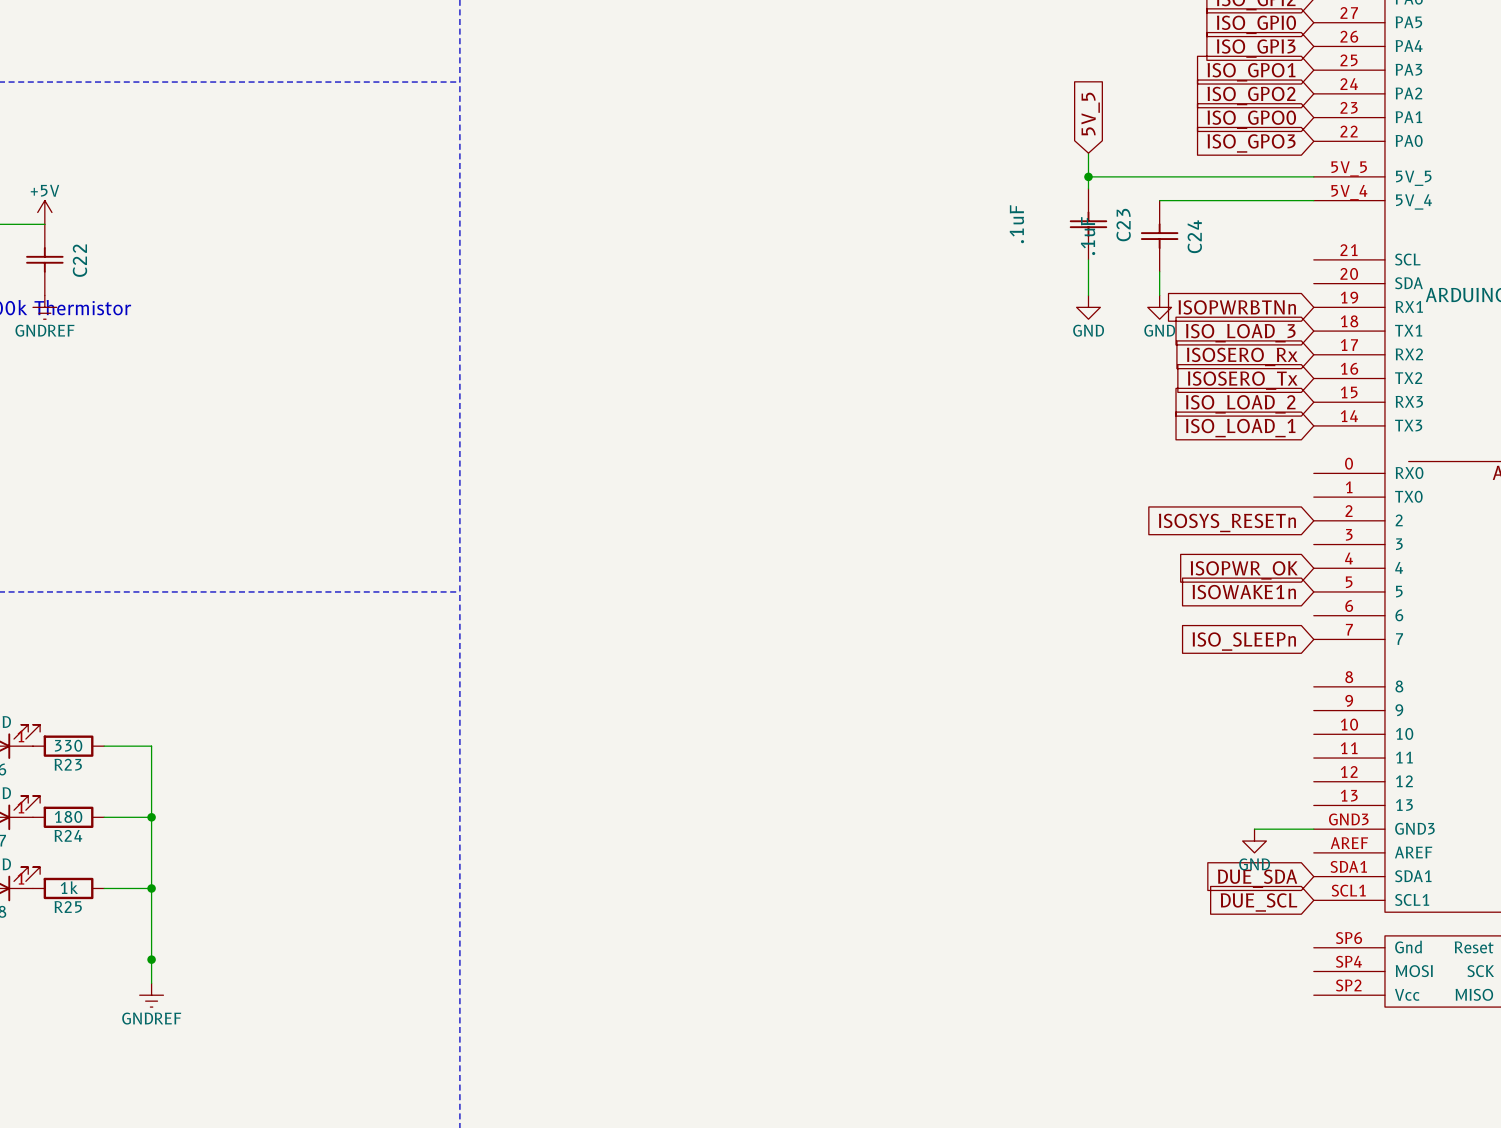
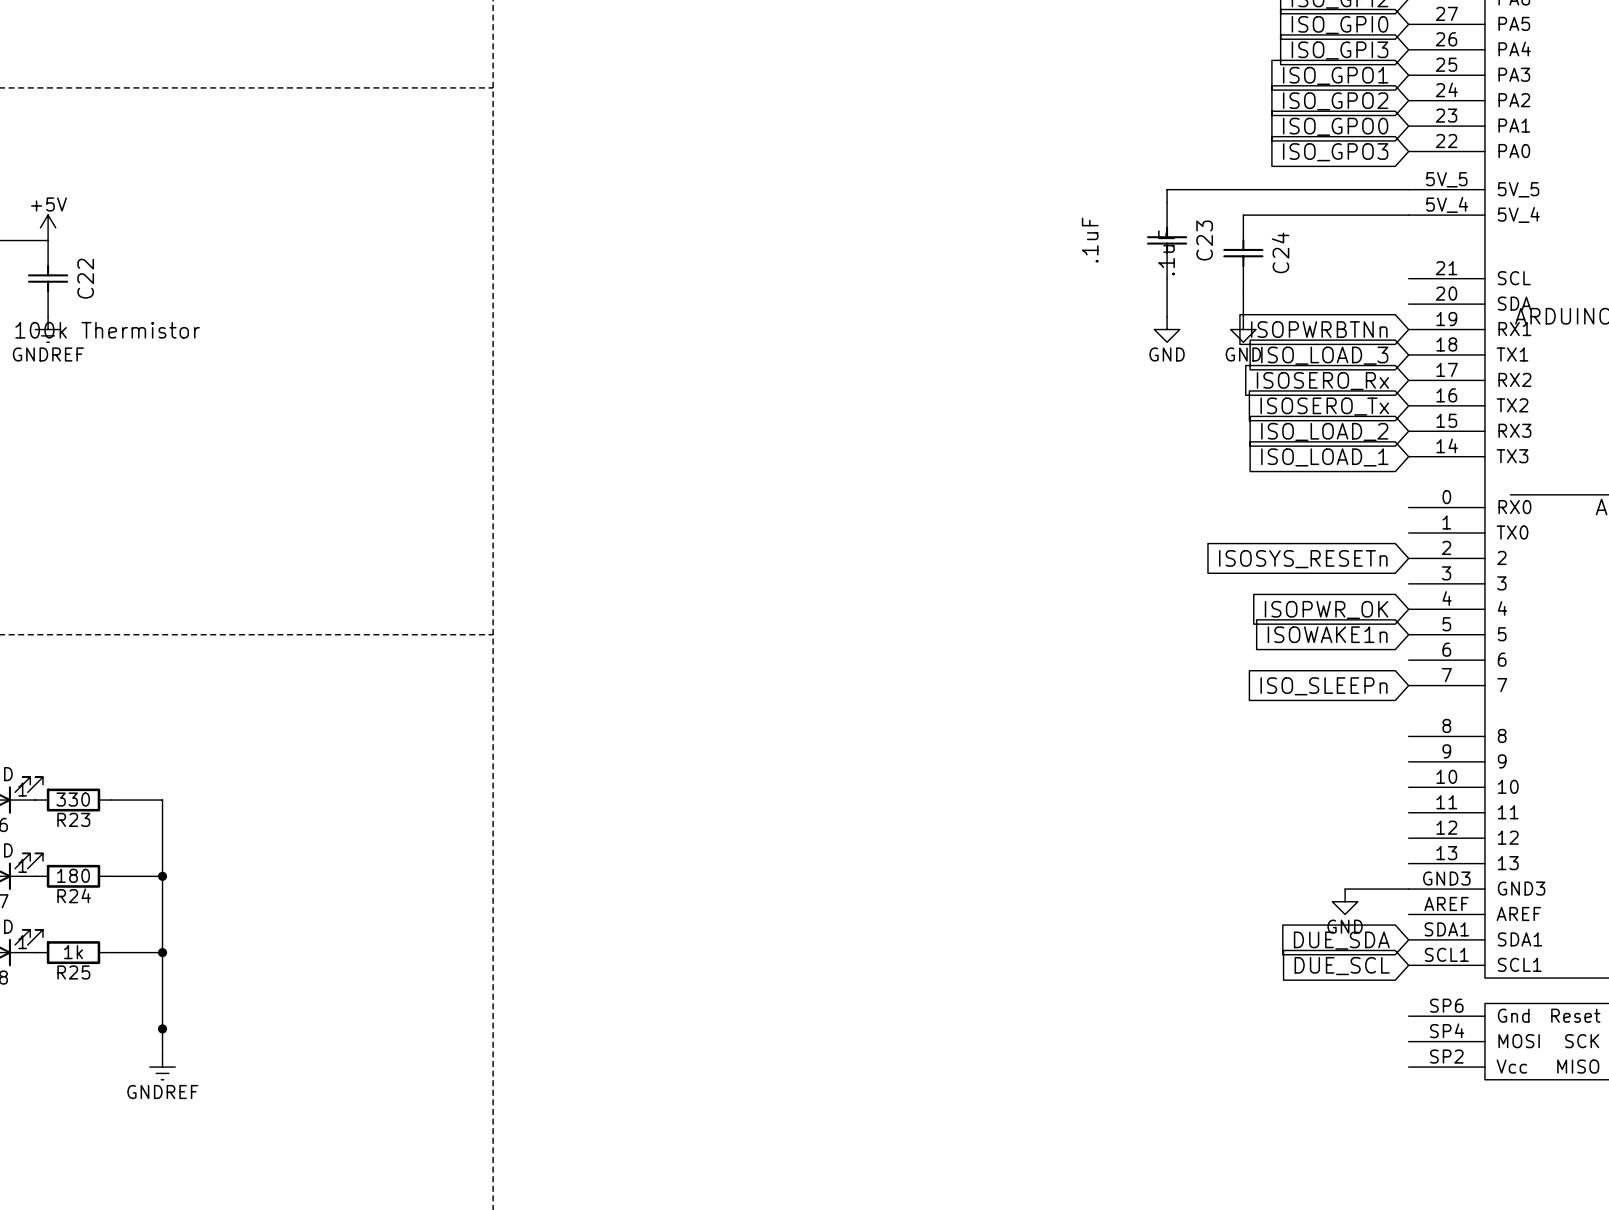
global label: 5V_5 (1090, 114) -> none
wire: (1088, 153) (1088, 176) -> none
junction: (1088, 176) -> none

